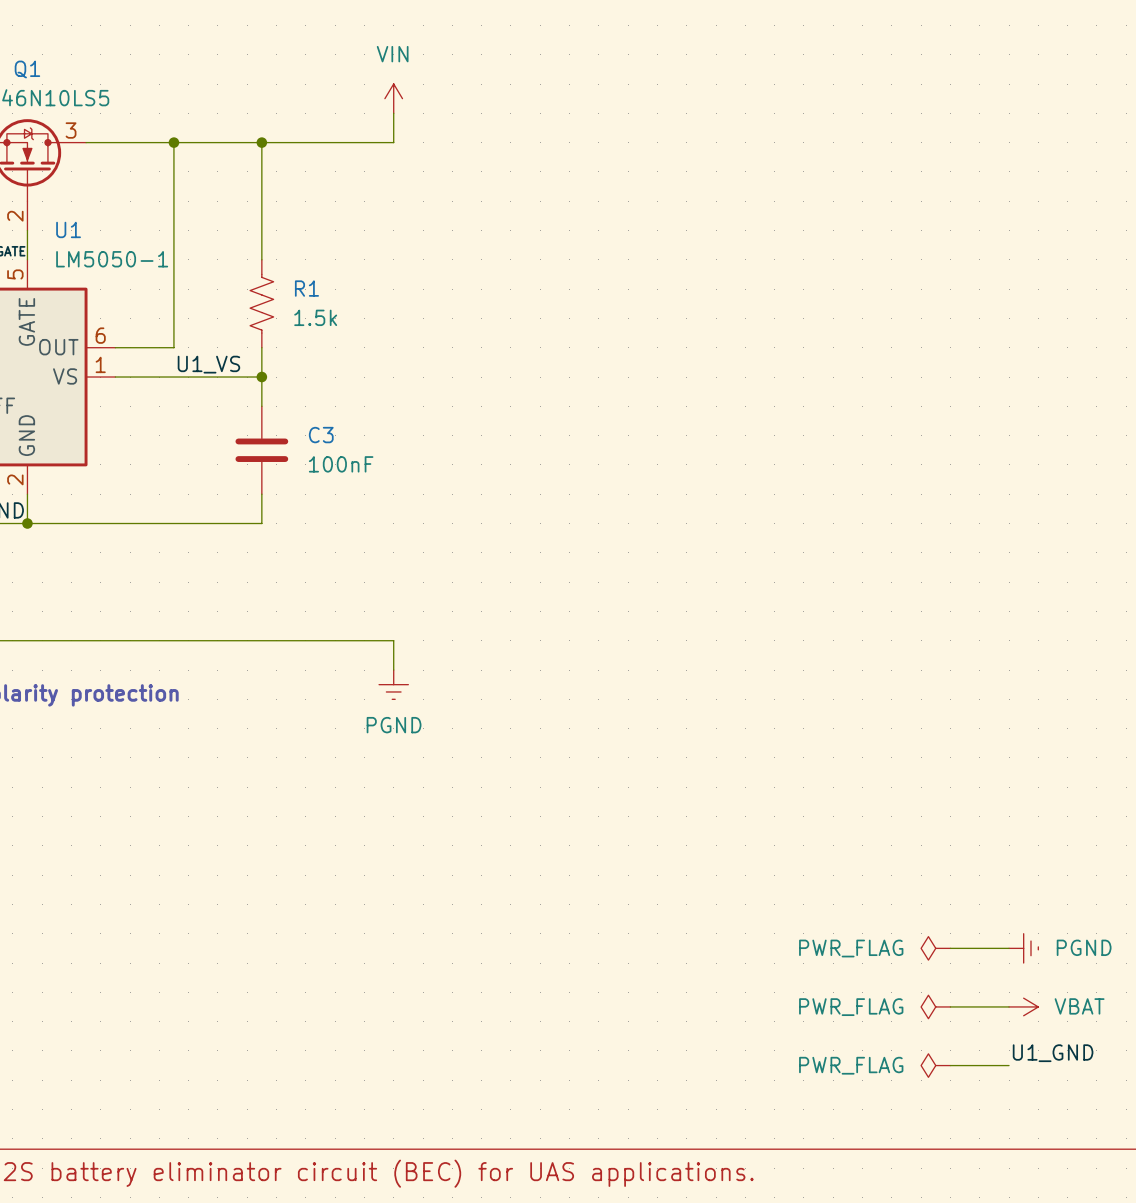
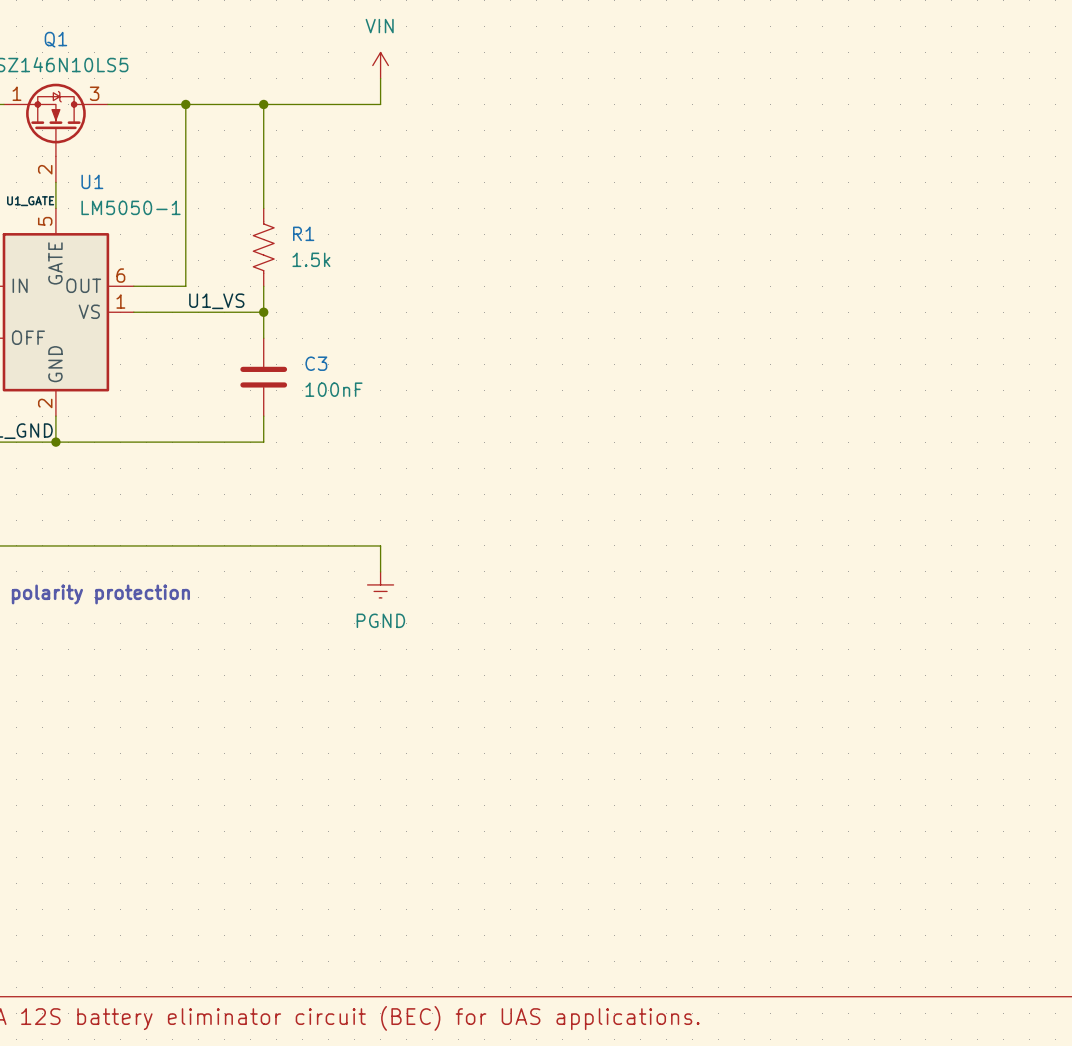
power symbol: PWR_FLAG (935, 948) -> none
wire: (950, 948) (1009, 948) -> none
power symbol: PGND (1023, 948) -> none
power symbol: PWR_FLAG (935, 1006) -> none
wire: (950, 1006) (1009, 1006) -> none
power symbol: VBAT (1023, 1006) -> none
label: U1_GND (1053, 1053) -> none
power symbol: PWR_FLAG (935, 1065) -> none
wire: (950, 1065) (1009, 1065) -> none

